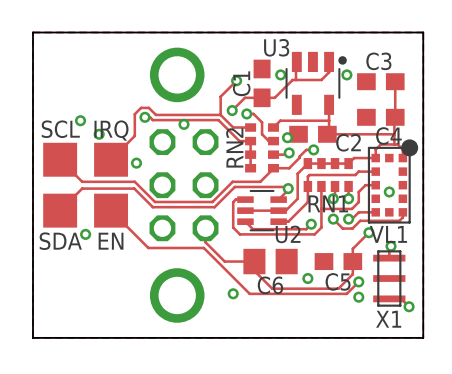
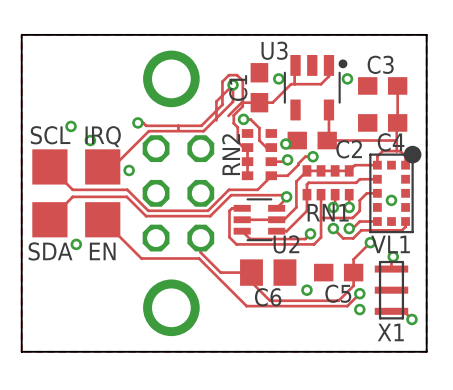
via: (232, 110) -> none
track: (206, 120) (218, 120) (239, 141) (246, 141) -> (201, 125) (222, 104) (222, 81) (228, 75) (237, 75) (242, 80) (242, 106) (233, 115) (233, 123) (237, 127) (237, 141) (243, 147)
track: (329, 120) (280, 120) (273, 127) -> none
via: (184, 124) -> none
track: (250, 127) (233, 127) (220, 114) (155, 114) (148, 107) (141, 107) (134, 114) (134, 135) (111, 159) -> (233, 84) (233, 101) (203, 131) (148, 131) (113, 166) (102, 166)
via: (233, 293) -> none

